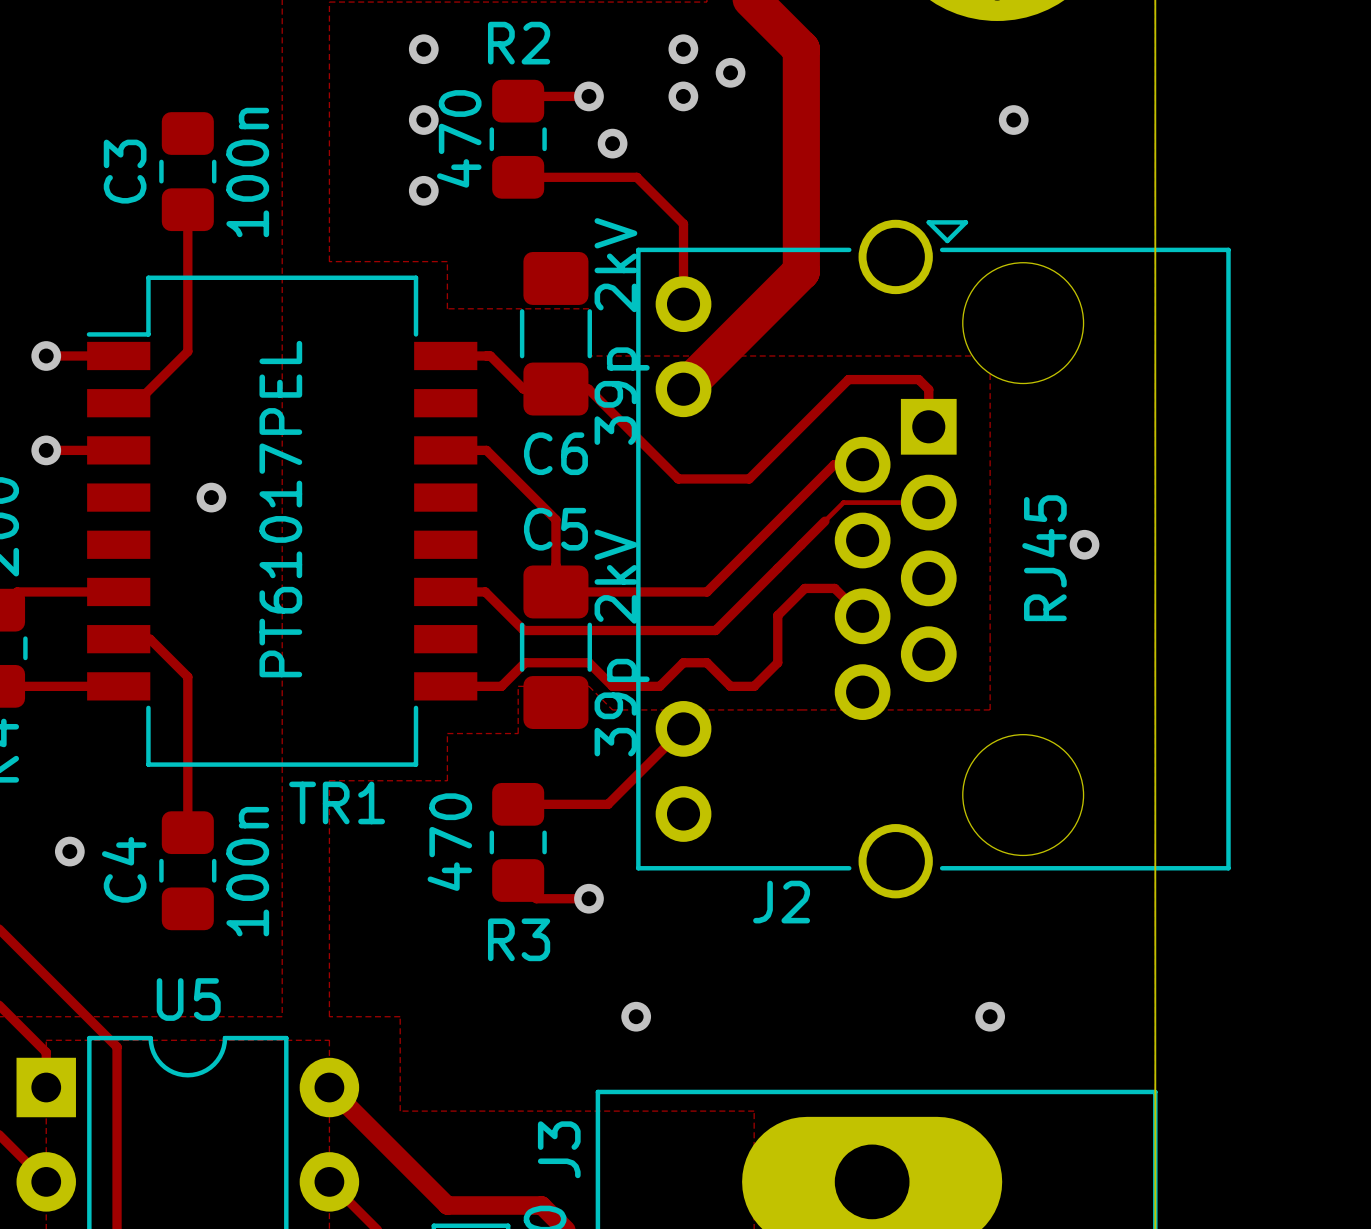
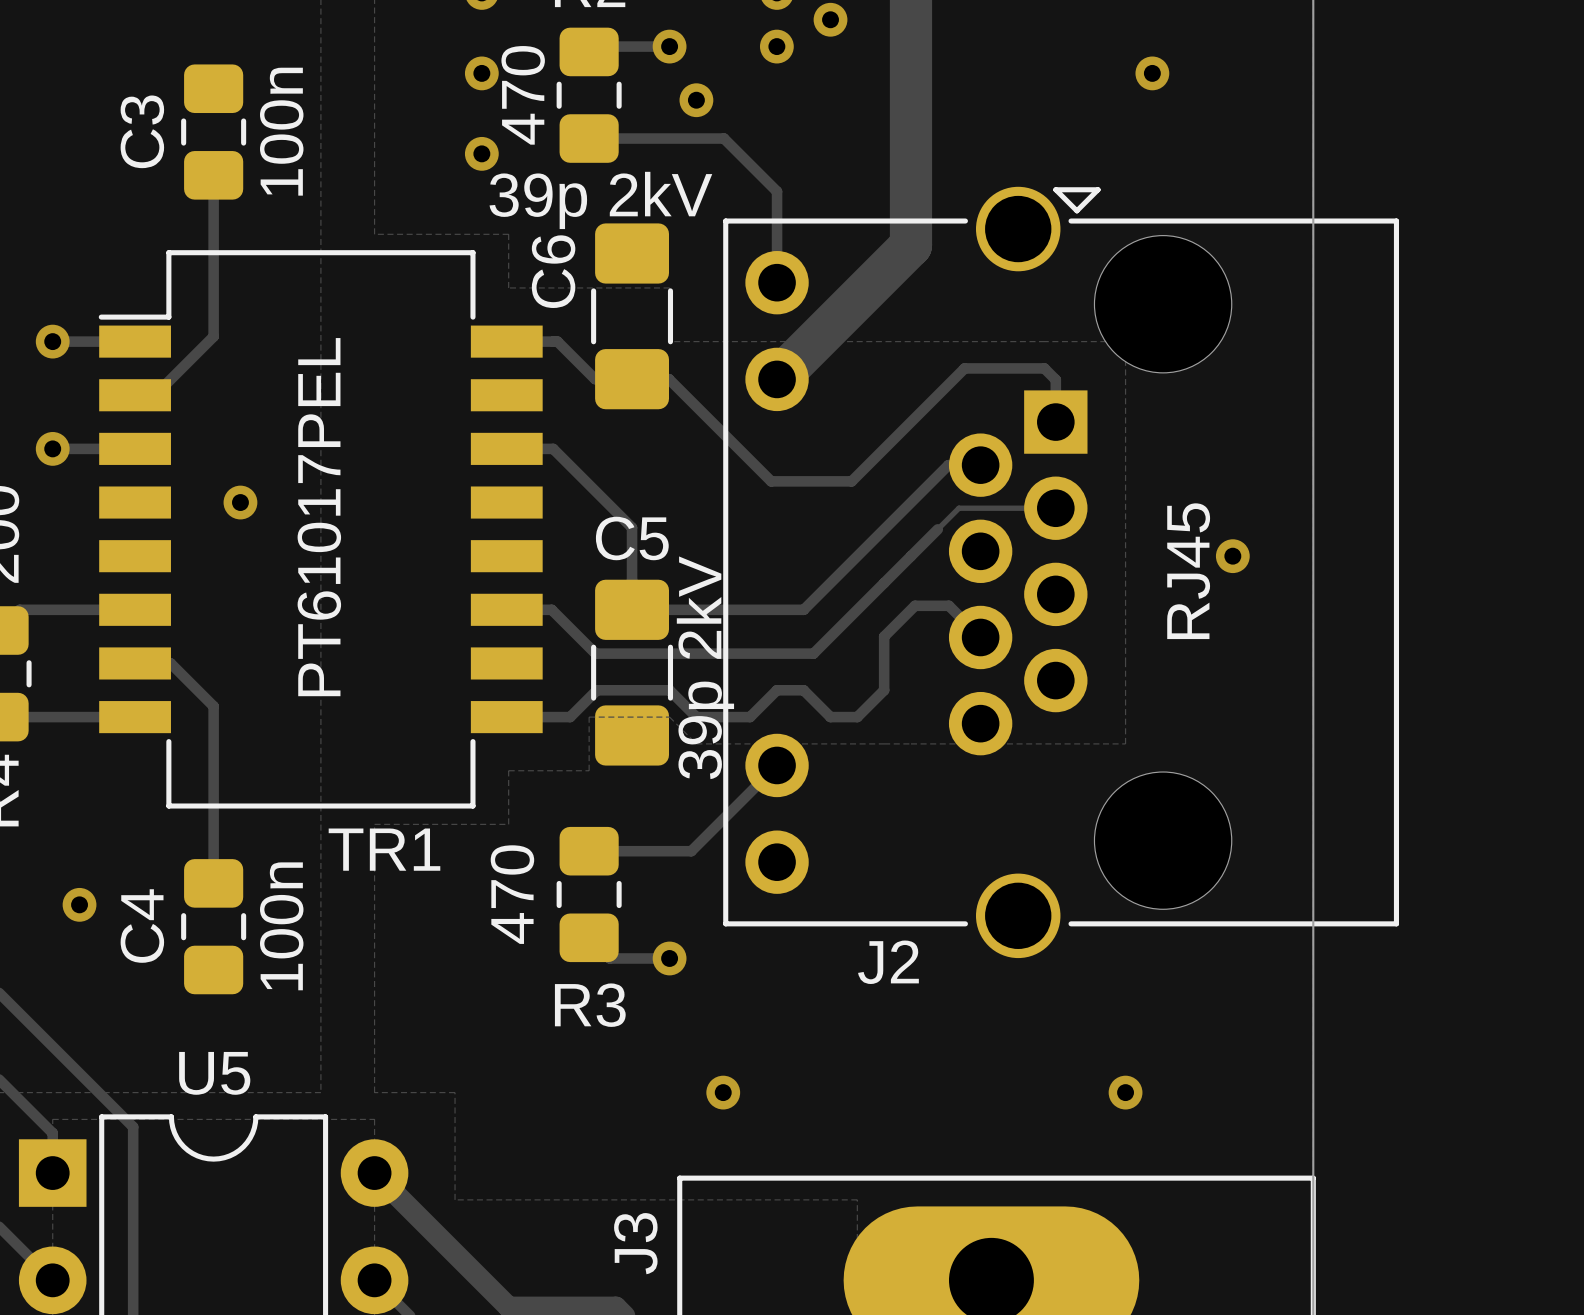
C6 value rotation: 0° (622, 331) -> 90° clockwise (600, 200)
C6 name rotation: 0° (555, 453) -> 90° counterclockwise (553, 271)
C6 name position: C6 (555, 453) -> C6 (553, 271)

